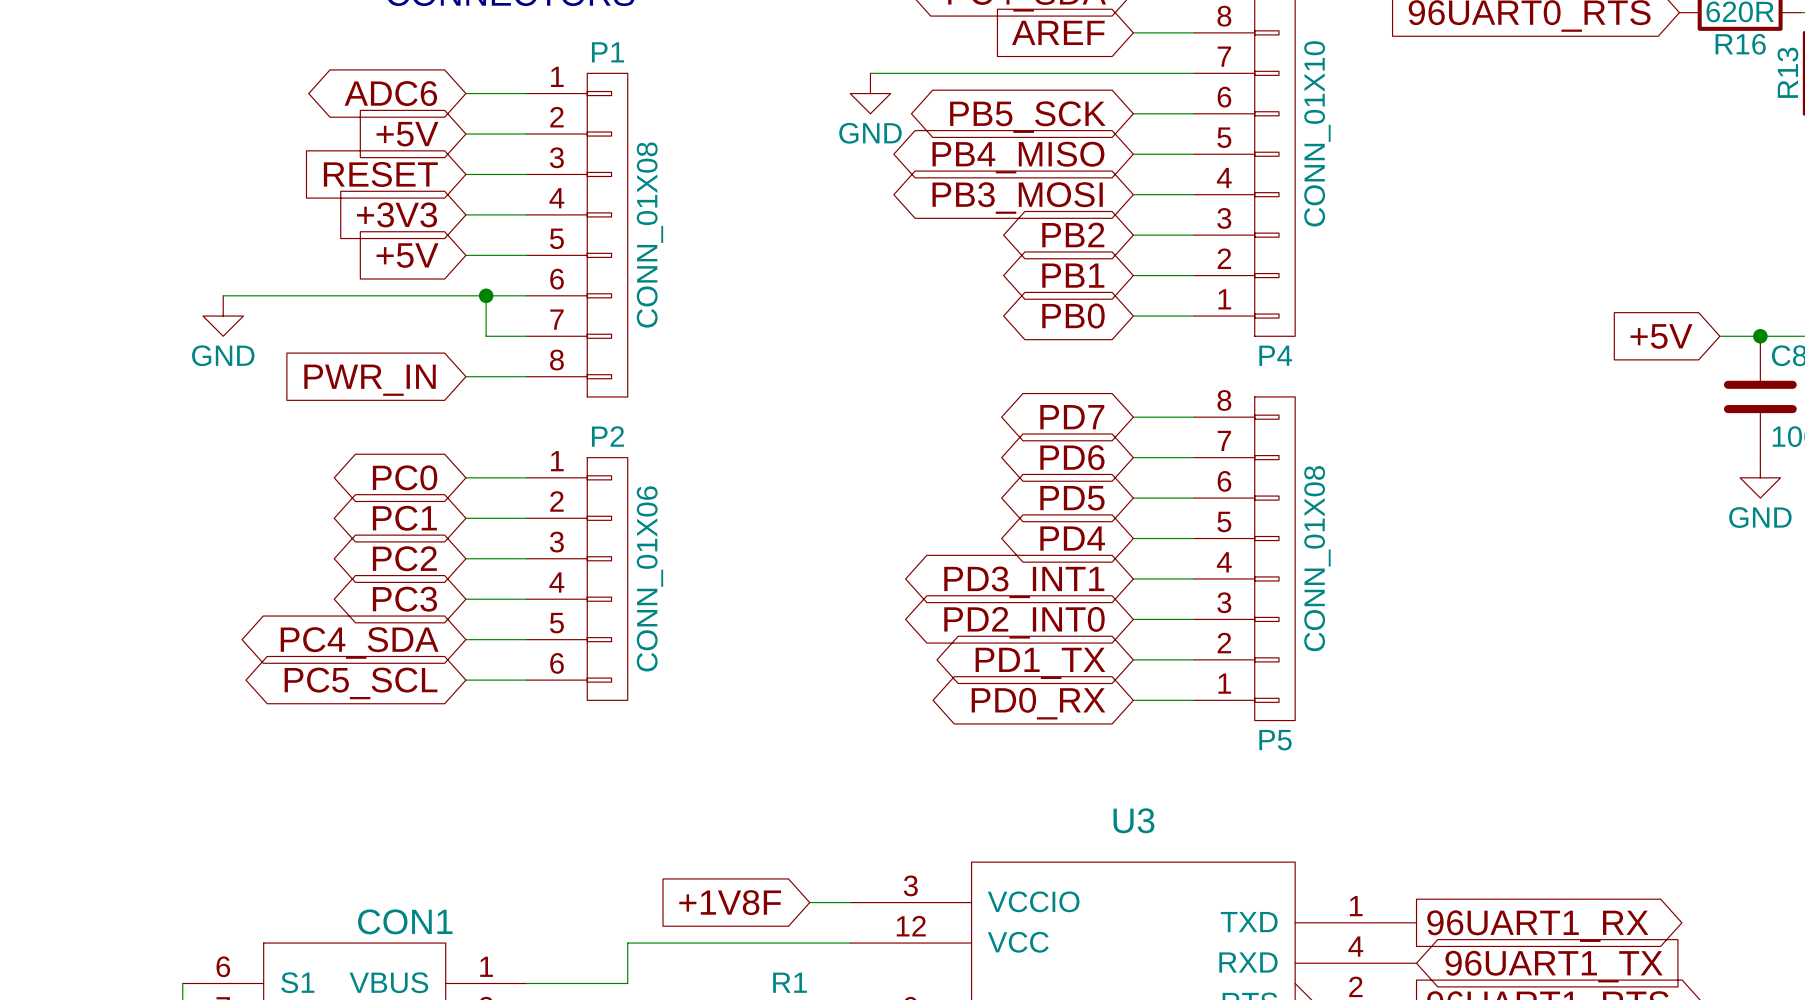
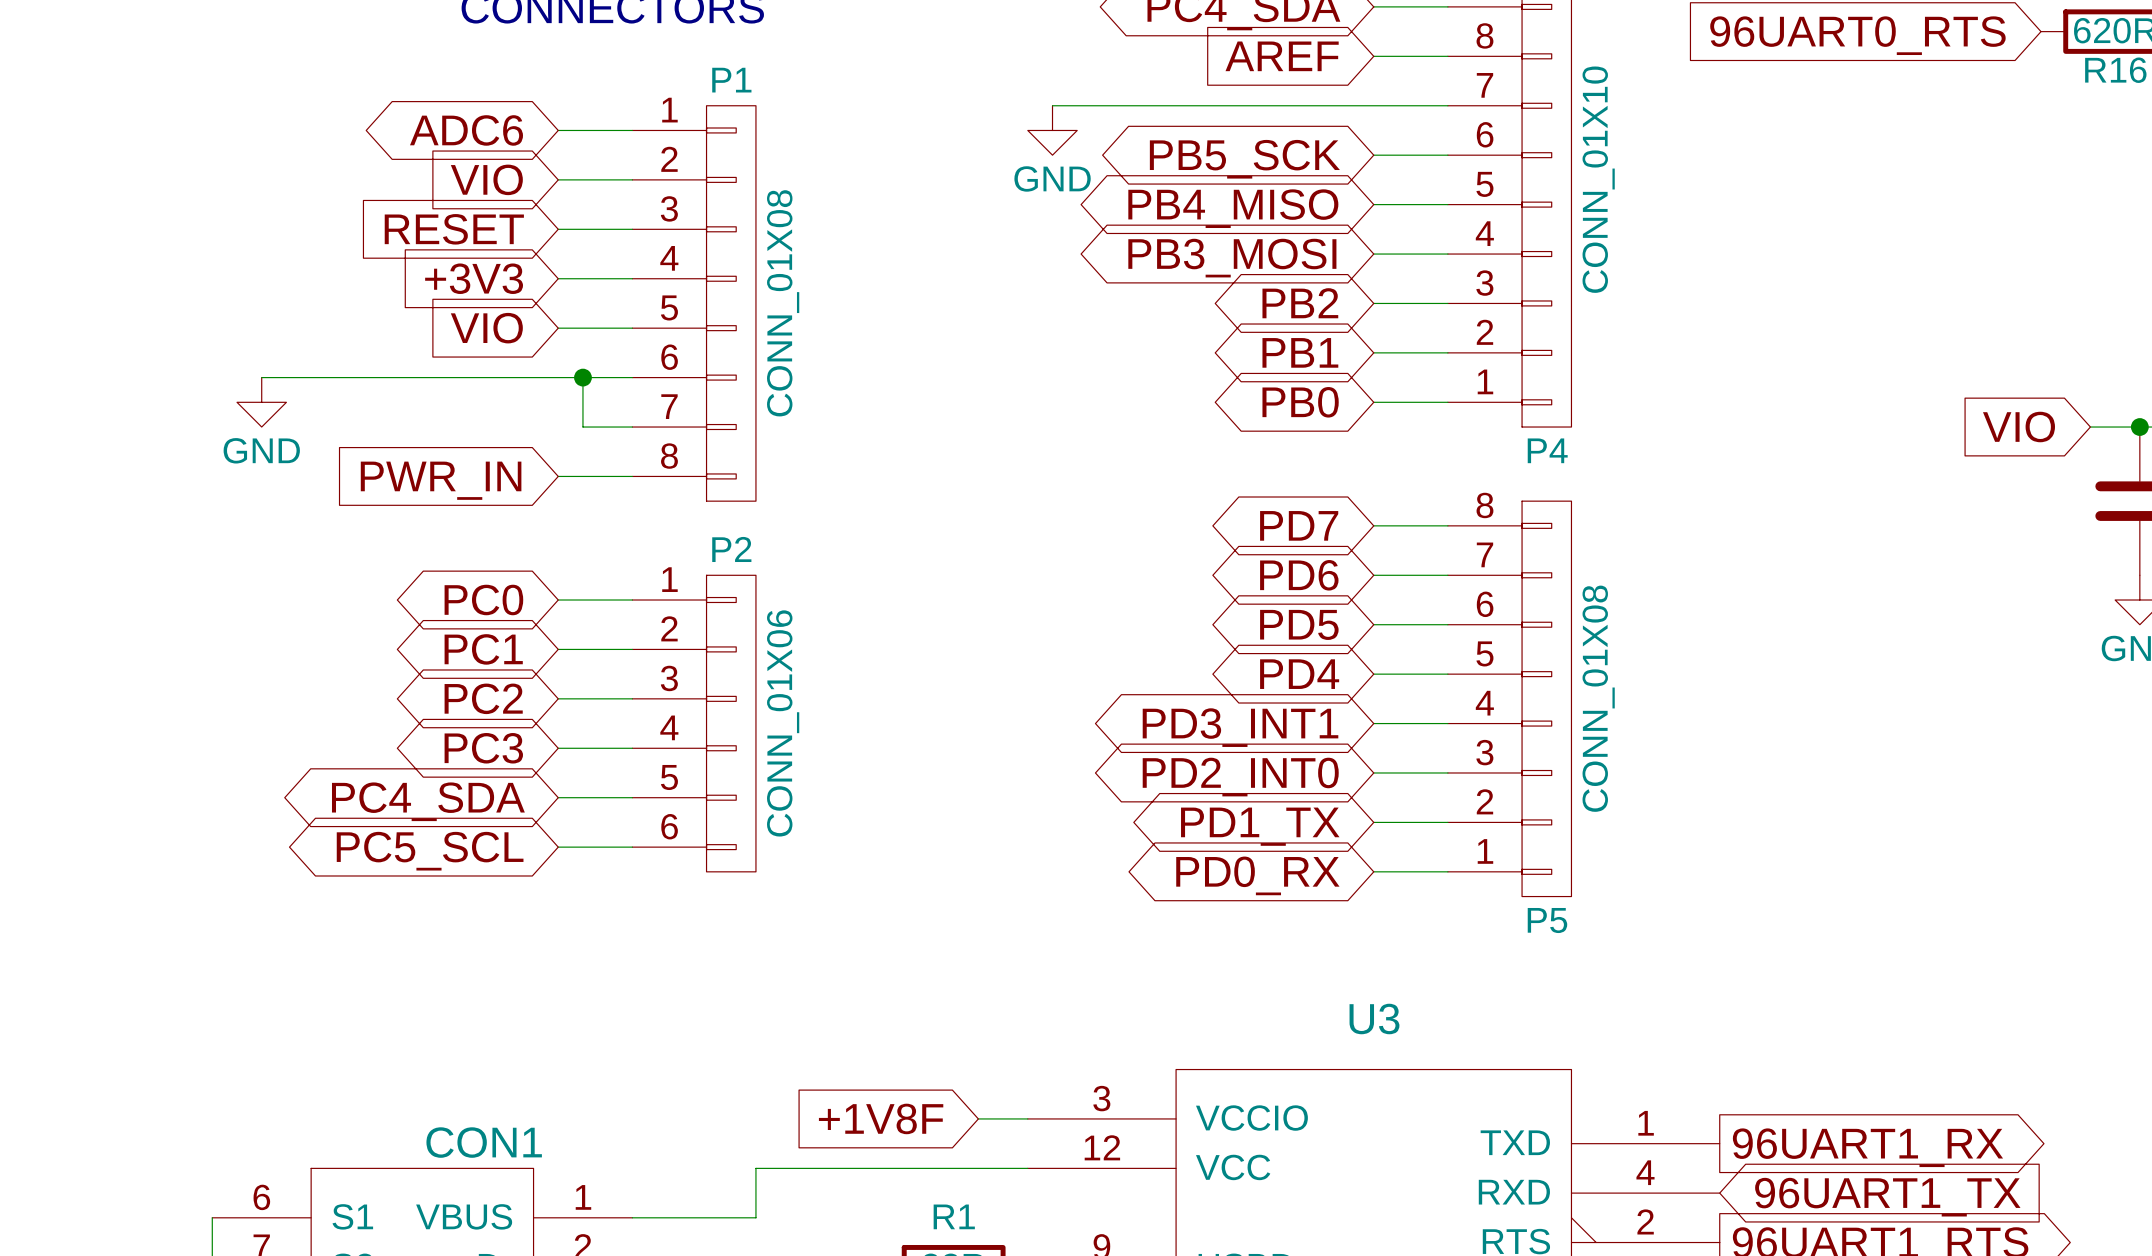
global label: +5V (407, 134) -> VIO (486, 179)
global label: +5V (407, 255) -> VIO (486, 328)
global label: +5V (1661, 336) -> VIO (2019, 427)

